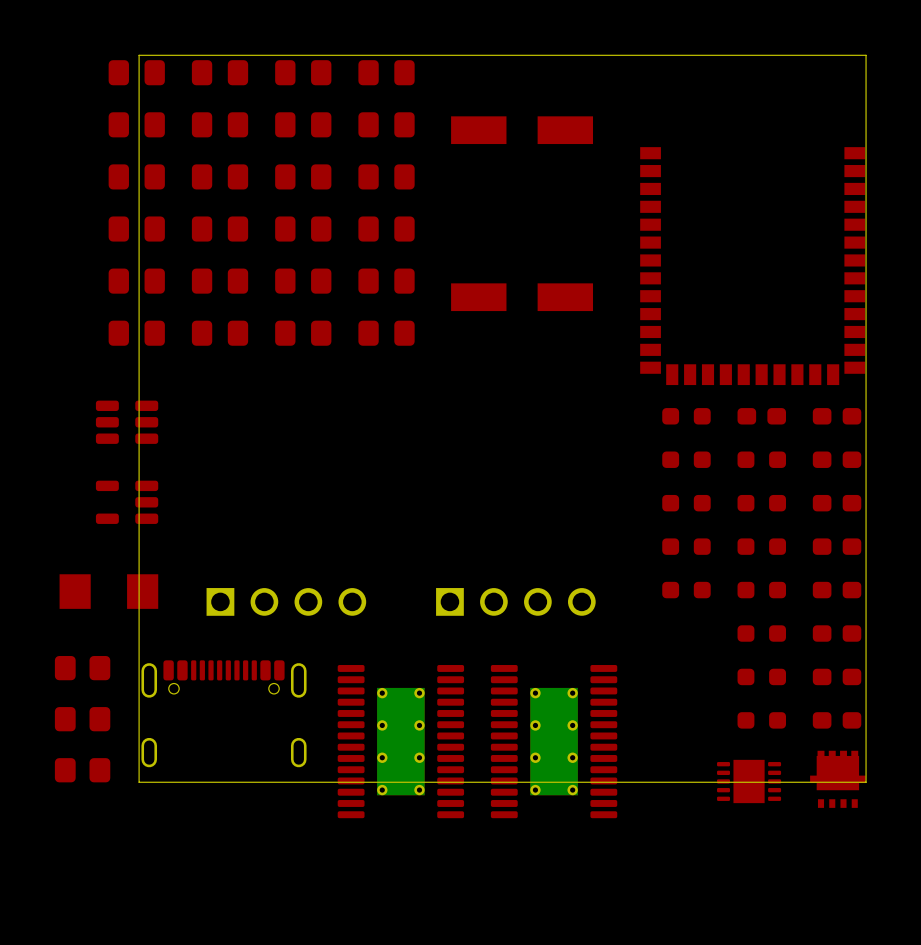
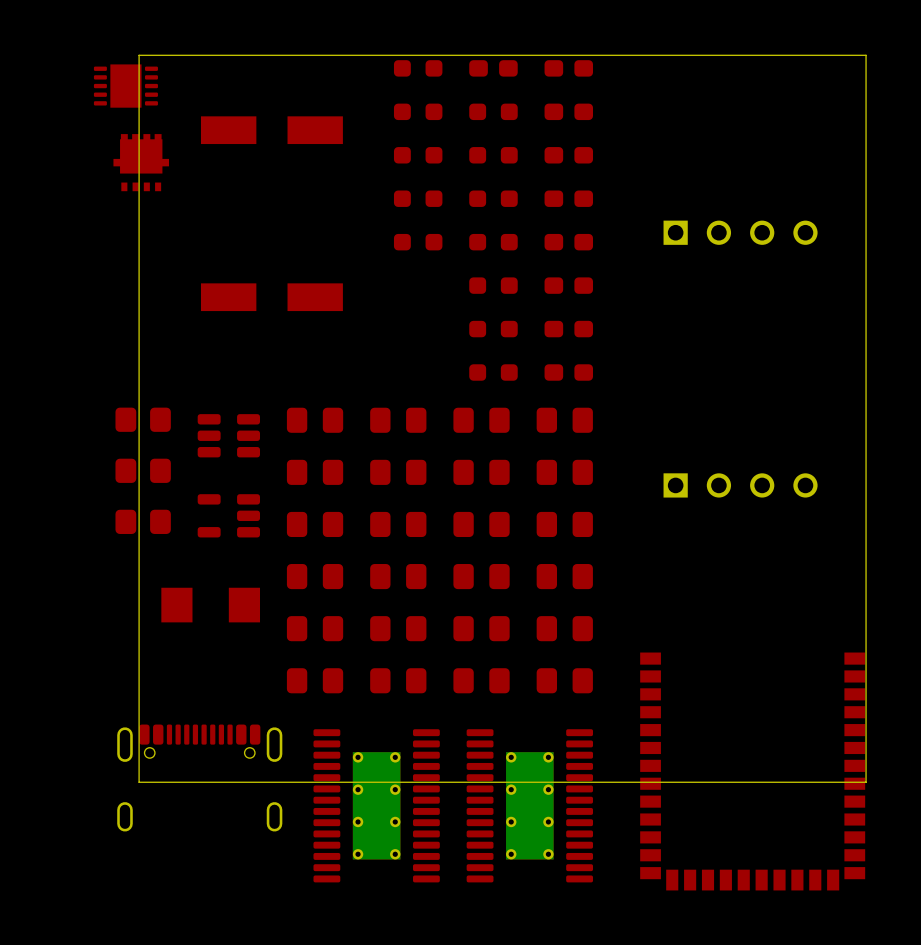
part footprint: [108, 60, 165, 86] -> [93, 64, 158, 108]
part: none -> (418, 68)
part: none -> (493, 68)
part: none -> (568, 68)
part: (220, 72) -> none
part: (303, 72) -> none
part: (386, 72) -> none
part: none -> (418, 111)
part: none -> (493, 111)
part: none -> (568, 111)
part: (136, 124) -> none
part: (220, 124) -> none
part: (303, 124) -> none
part: (386, 124) -> none
part: none -> (271, 130)
part: (522, 130) -> none
part: none -> (418, 155)
part: none -> (493, 155)
part: none -> (568, 155)
part footprint: [108, 164, 165, 190] -> [113, 134, 170, 192]
part: (220, 176) -> none
part: (303, 176) -> none
part: (386, 176) -> none
part: none -> (418, 198)
part: none -> (493, 198)
part: none -> (568, 198)
part: (136, 229) -> none
part: (220, 229) -> none
part: (303, 229) -> none
part: (386, 229) -> none
part: none -> (740, 232)
part: none -> (418, 242)
part: none -> (493, 242)
part: none -> (568, 242)
part: (752, 266) -> none
part: (136, 281) -> none
part: (220, 281) -> none
part: (303, 281) -> none
part: (386, 281) -> none
part: none -> (493, 285)
part: none -> (568, 285)
part: none -> (271, 297)
part: (522, 297) -> none
part: none -> (493, 329)
part: none -> (568, 329)
part: (136, 333) -> none
part: (220, 333) -> none
part: (303, 333) -> none
part: (386, 333) -> none
part: none -> (493, 372)
part: none -> (568, 372)
part footprint: [95, 400, 159, 444] -> [115, 407, 171, 432]
part: (686, 416) -> none
part: (761, 416) -> none
part: (837, 416) -> none
part: none -> (315, 420)
part: none -> (398, 420)
part: none -> (481, 420)
part: none -> (564, 420)
part: none -> (228, 435)
part: (686, 459) -> none
part: (761, 459) -> none
part: (837, 459) -> none
part: none -> (143, 470)
part: none -> (315, 472)
part: none -> (398, 472)
part: none -> (481, 472)
part: none -> (564, 472)
part: none -> (740, 485)
part position: (127, 502) -> (228, 515)
part: (686, 503) -> none
part: (761, 503) -> none
part: (837, 503) -> none
part: none -> (143, 521)
part: none -> (315, 524)
part: none -> (398, 524)
part: none -> (481, 524)
part: none -> (564, 524)
part: (686, 546) -> none
part: (761, 546) -> none
part: (837, 546) -> none
part: none -> (315, 576)
part: none -> (398, 576)
part: none -> (481, 576)
part: none -> (564, 576)
part: (686, 590) -> none
part: (761, 590) -> none
part: (837, 590) -> none
part position: (108, 591) -> (210, 605)
part: (286, 601) -> none
part: (515, 601) -> none
part: none -> (315, 628)
part: none -> (398, 628)
part: none -> (481, 628)
part: none -> (564, 628)
part: (761, 633) -> none
part: (837, 633) -> none
part: (82, 668) -> none
part: (761, 676) -> none
part: (837, 676) -> none
part: none -> (315, 680)
part: none -> (398, 680)
part: none -> (481, 680)
part: none -> (564, 680)
part position: (223, 713) -> (199, 778)
part: (82, 719) -> none
part: (761, 720) -> none
part: (837, 720) -> none
part position: (400, 741) -> (376, 805)
part position: (554, 741) -> (529, 805)
part footprint: [717, 759, 782, 804] -> [640, 652, 866, 891]
part: (82, 770) -> none
part: (837, 779) -> none

